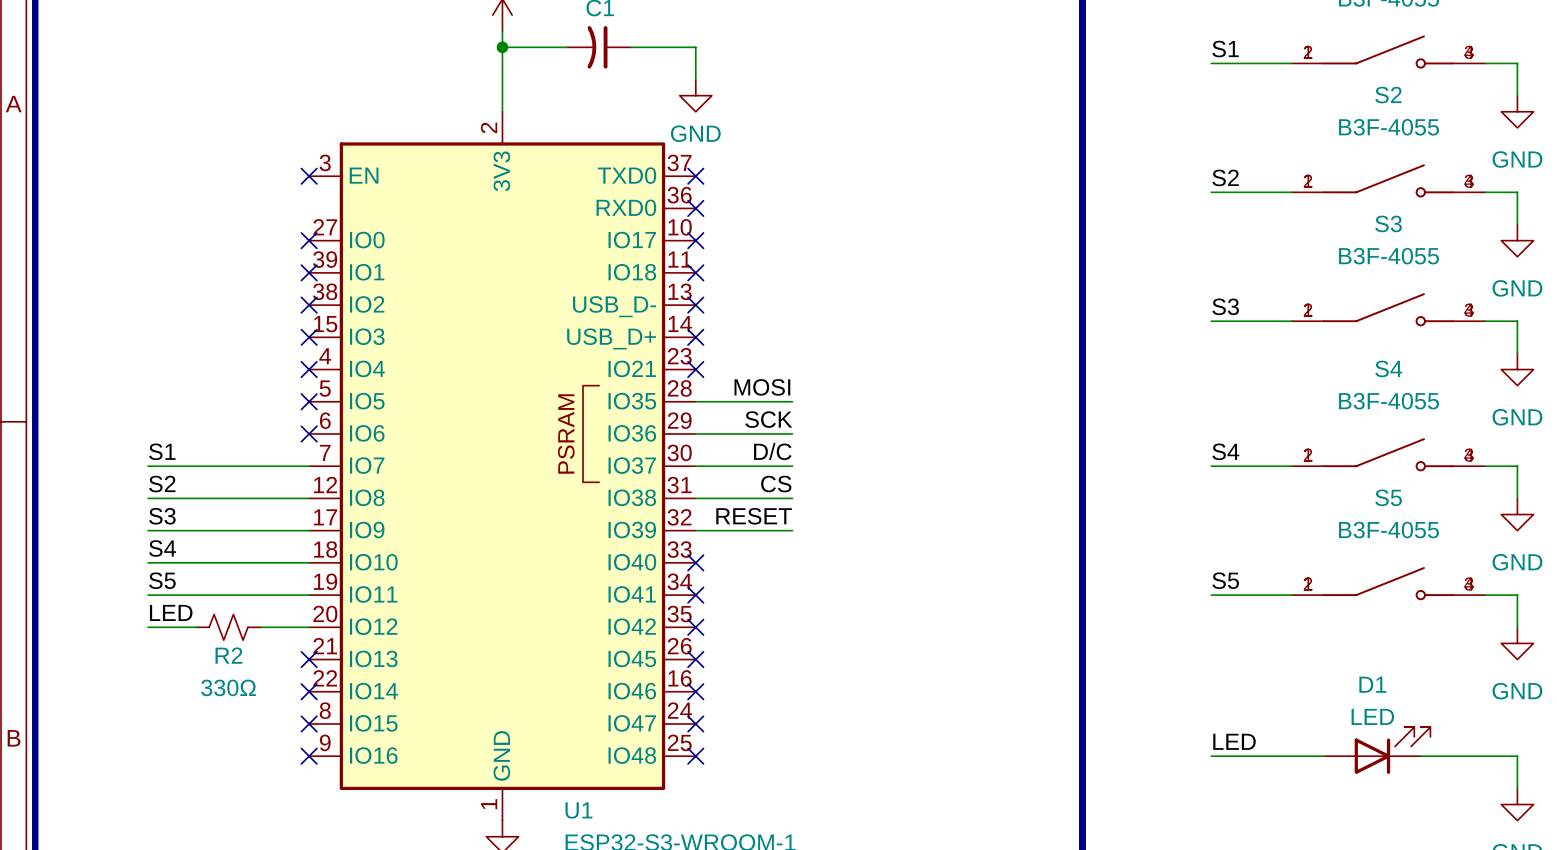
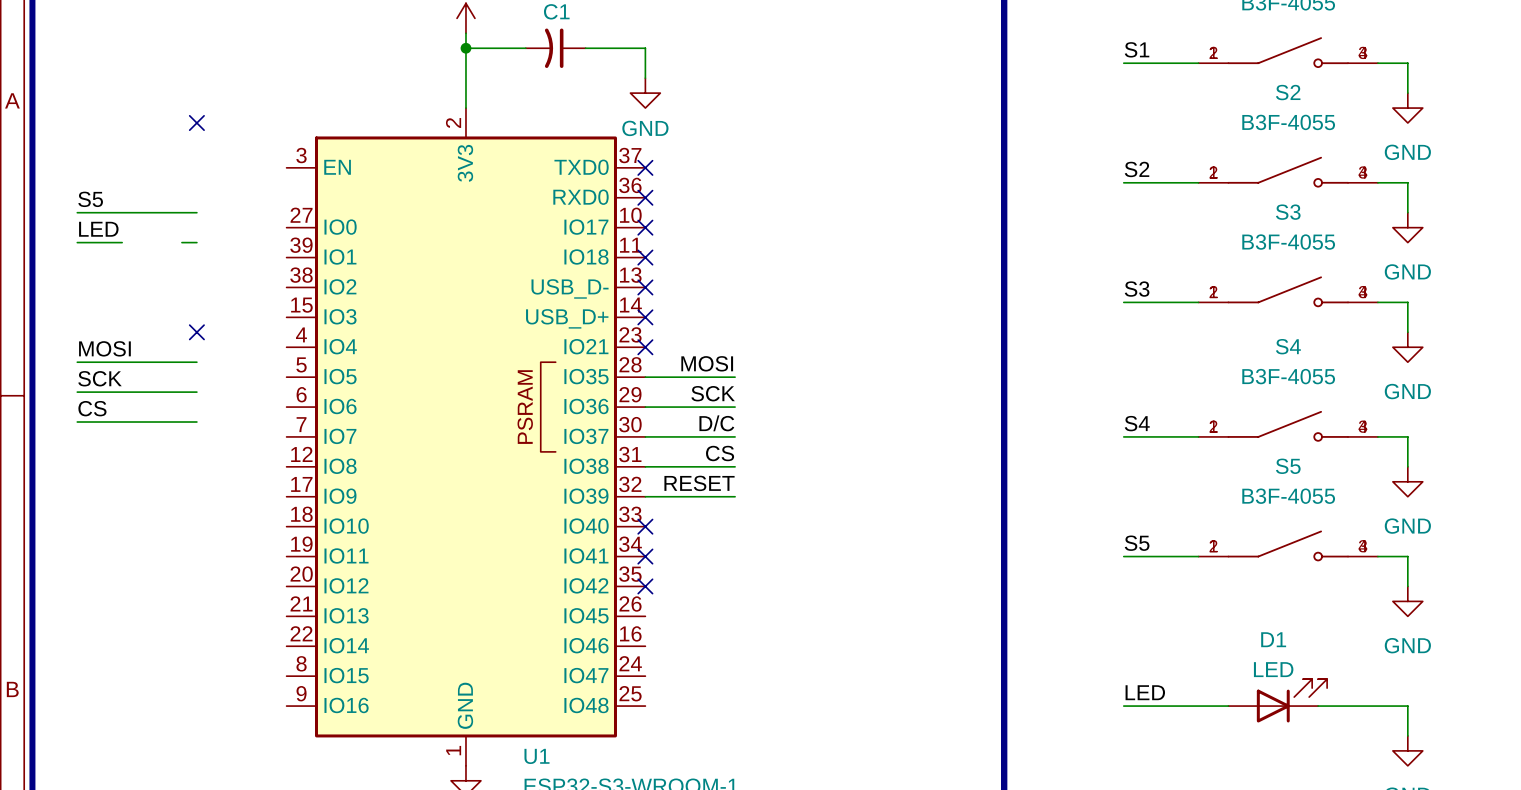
no-connect mark: none -> (196, 123)
no-connect mark: (309, 176) -> none
label: none -> S5 (90, 199)
wire: none -> (77, 212) (196, 212)
no-connect mark: (309, 240) -> none
label: none -> LED (98, 229)
wire: none -> (77, 242) (122, 242)
wire: none -> (181, 242) (196, 242)
no-connect mark: (309, 272) -> none
no-connect mark: (309, 305) -> none
no-connect mark: (309, 337) -> none
no-connect mark: none -> (196, 332)
no-connect mark: (309, 369) -> none
label: none -> MOSI (104, 348)
wire: none -> (77, 362) (196, 362)
no-connect mark: (309, 401) -> none
label: none -> SCK (100, 378)
wire: none -> (77, 392) (196, 392)
no-connect mark: (309, 433) -> none
label: none -> CS (92, 408)
wire: none -> (77, 422) (196, 422)
label: S1 (162, 451) -> none
wire: (148, 466) (309, 466) -> none
label: S2 (162, 484) -> none
wire: (148, 498) (309, 498) -> none
label: S3 (162, 516) -> none
wire: (148, 530) (309, 530) -> none
label: S4 (162, 548) -> none
wire: (148, 562) (309, 562) -> none
label: S5 (162, 580) -> none
wire: (148, 595) (309, 595) -> none
label: LED (171, 612) -> none
wire: (148, 627) (196, 627) -> none
R2: 330Ω (228, 627) -> none
wire: (260, 627) (309, 627) -> none
no-connect mark: (309, 659) -> none
no-connect mark: (695, 659) -> none
no-connect mark: (309, 691) -> none
no-connect mark: (695, 691) -> none
no-connect mark: (309, 723) -> none
no-connect mark: (695, 723) -> none
no-connect mark: (309, 756) -> none
no-connect mark: (695, 756) -> none

